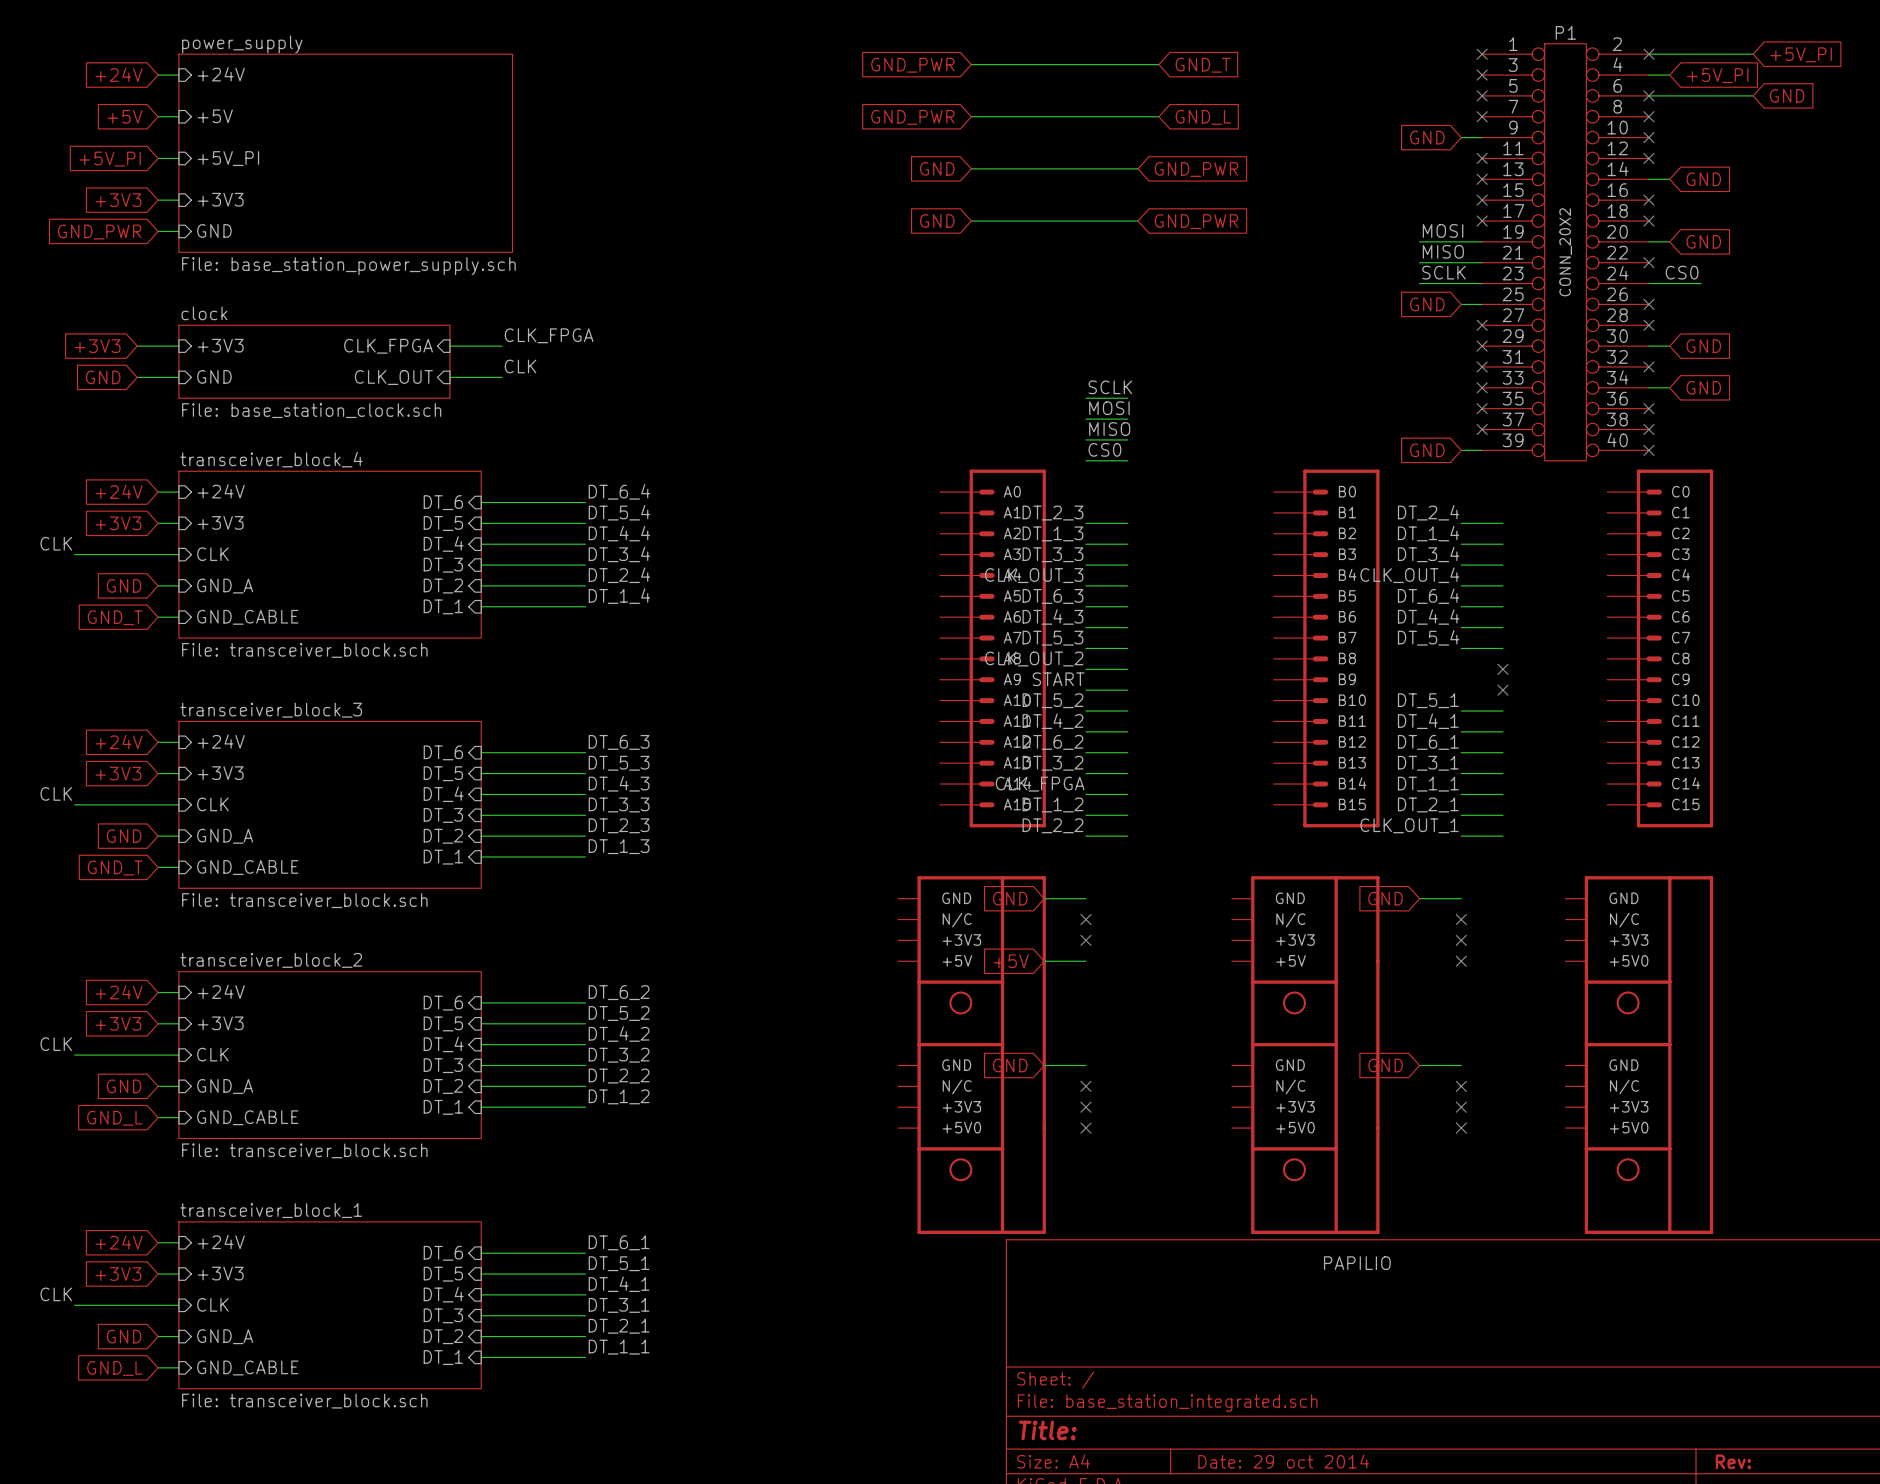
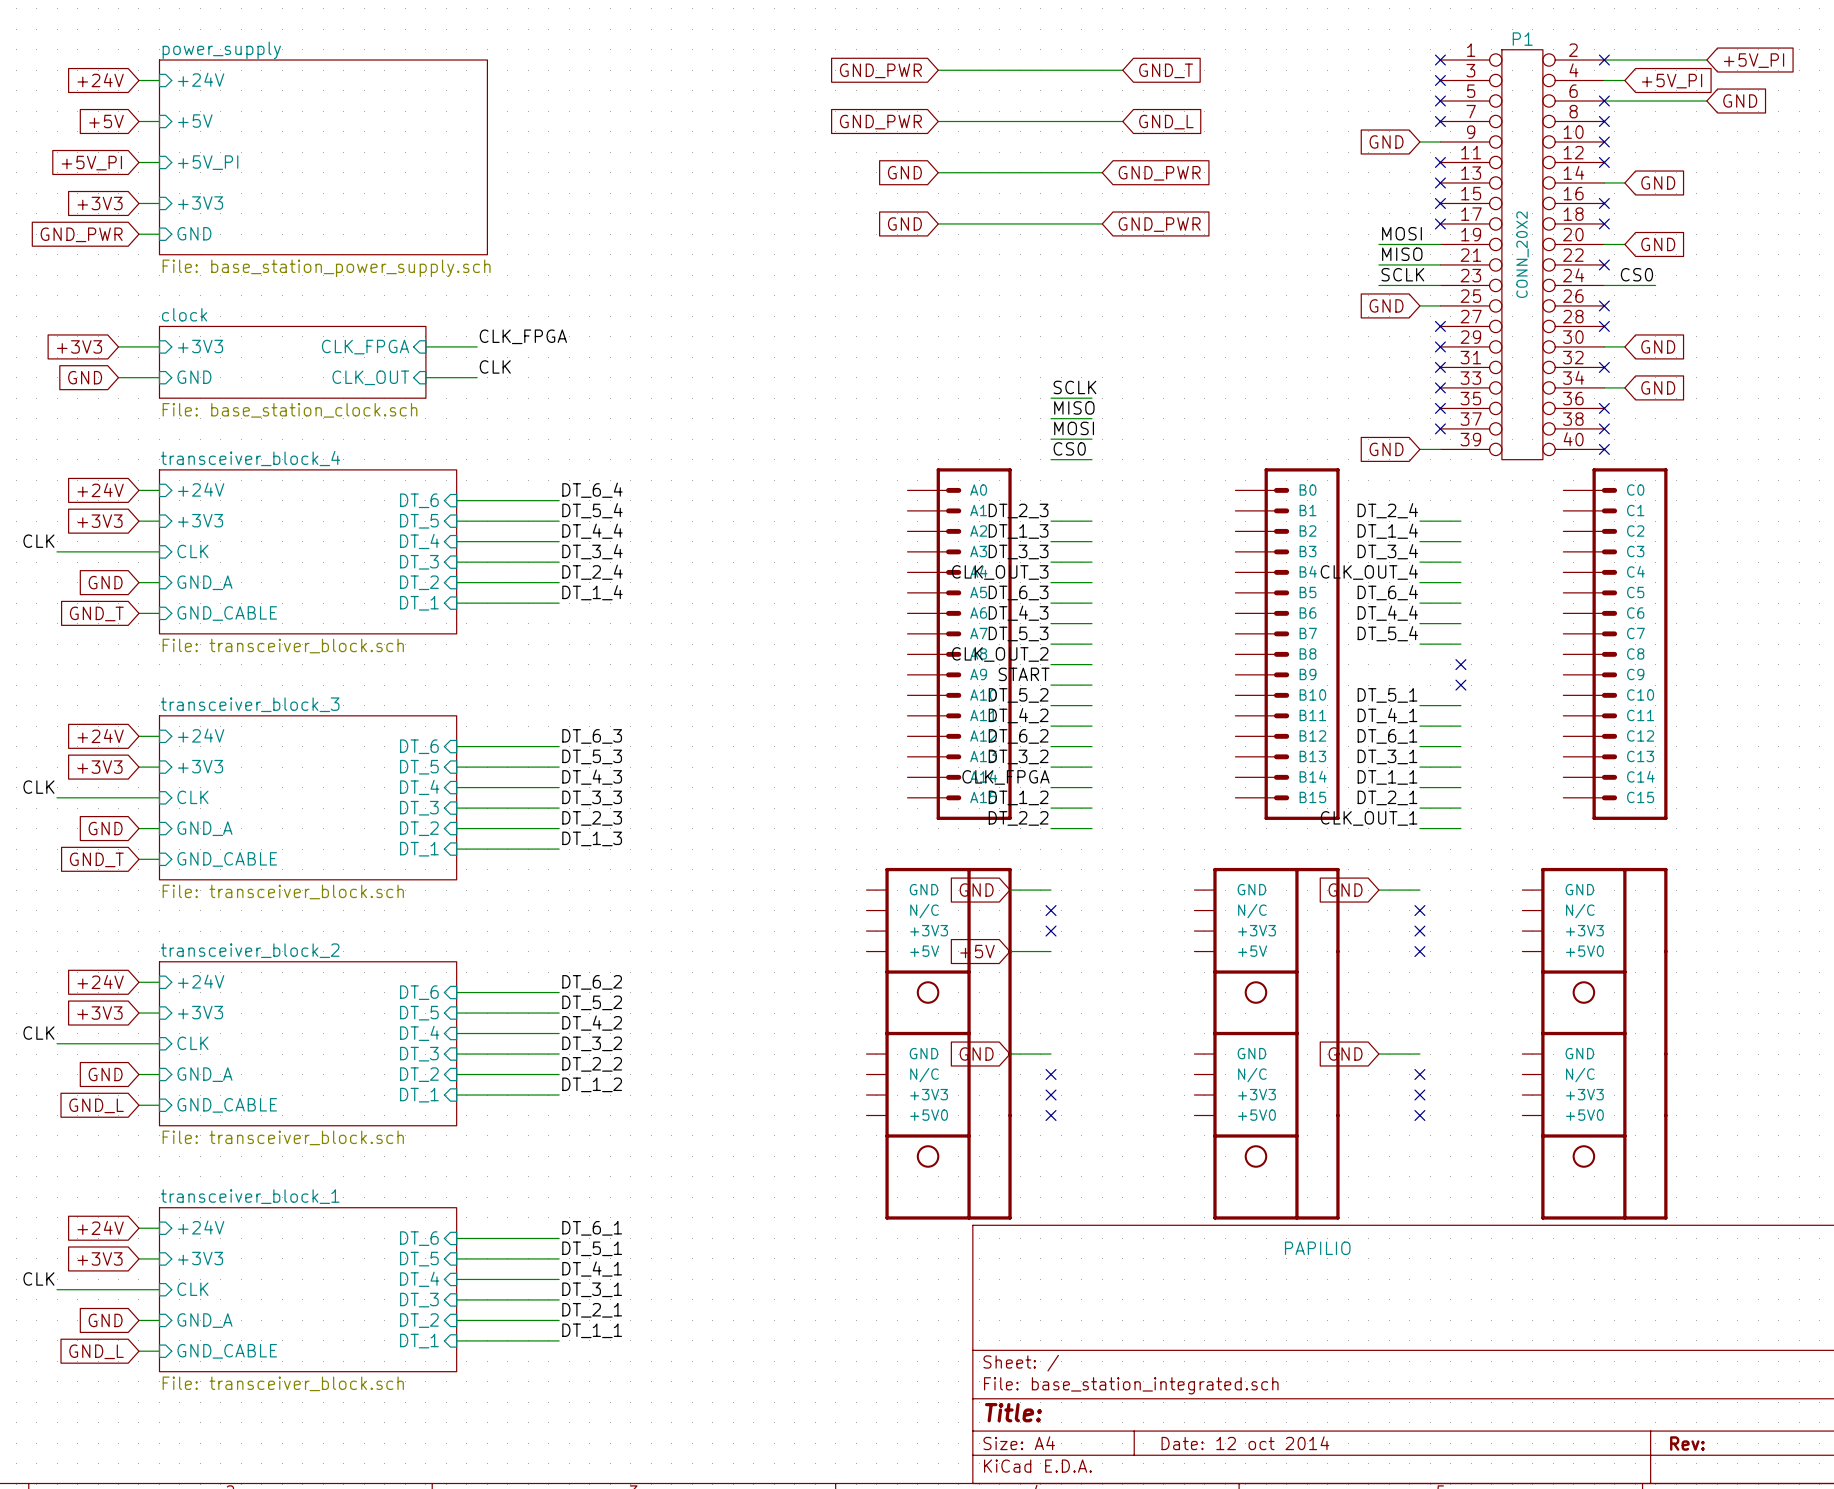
label: MOSI (1109, 408) -> MISO (1074, 407)
label: MISO (1109, 429) -> MOSI (1074, 428)
title block: Date: 29 oct 2014 (1283, 1461) -> Date: 12 oct 2014 (1245, 1443)

